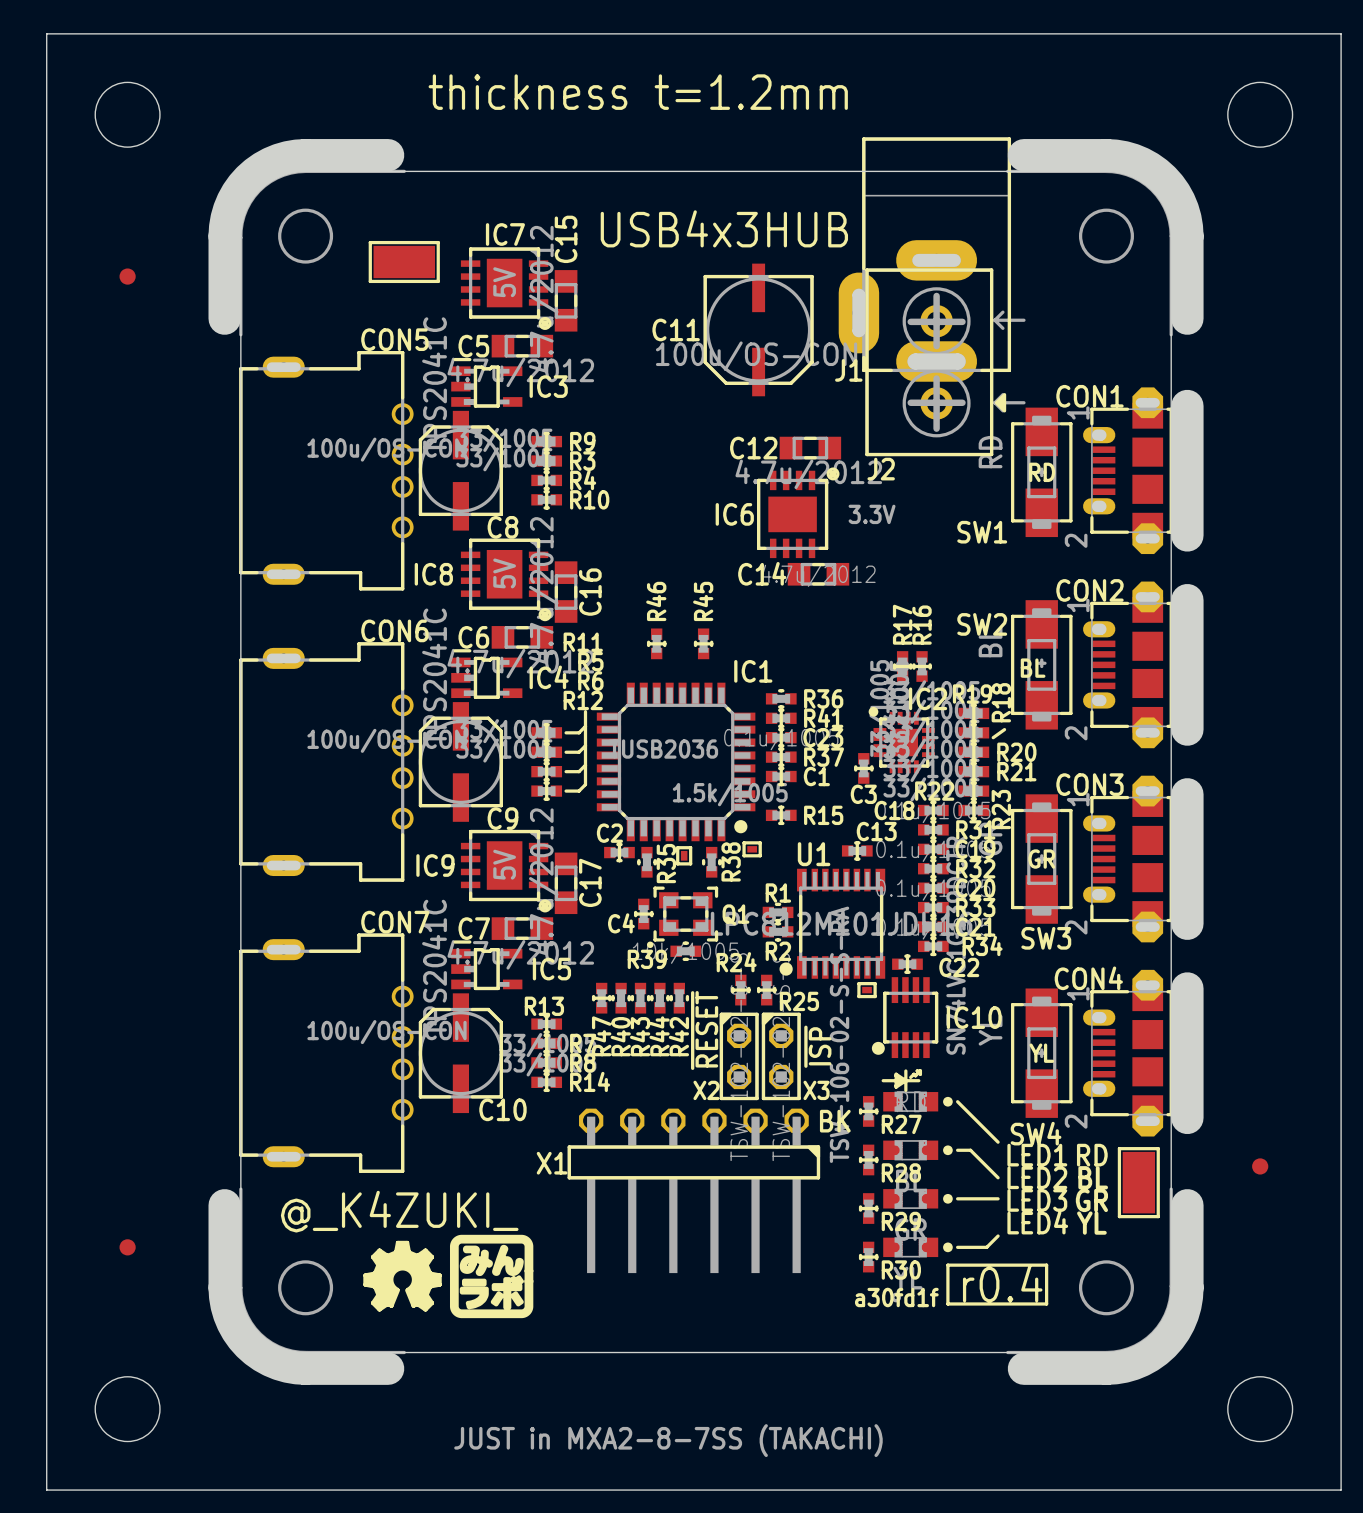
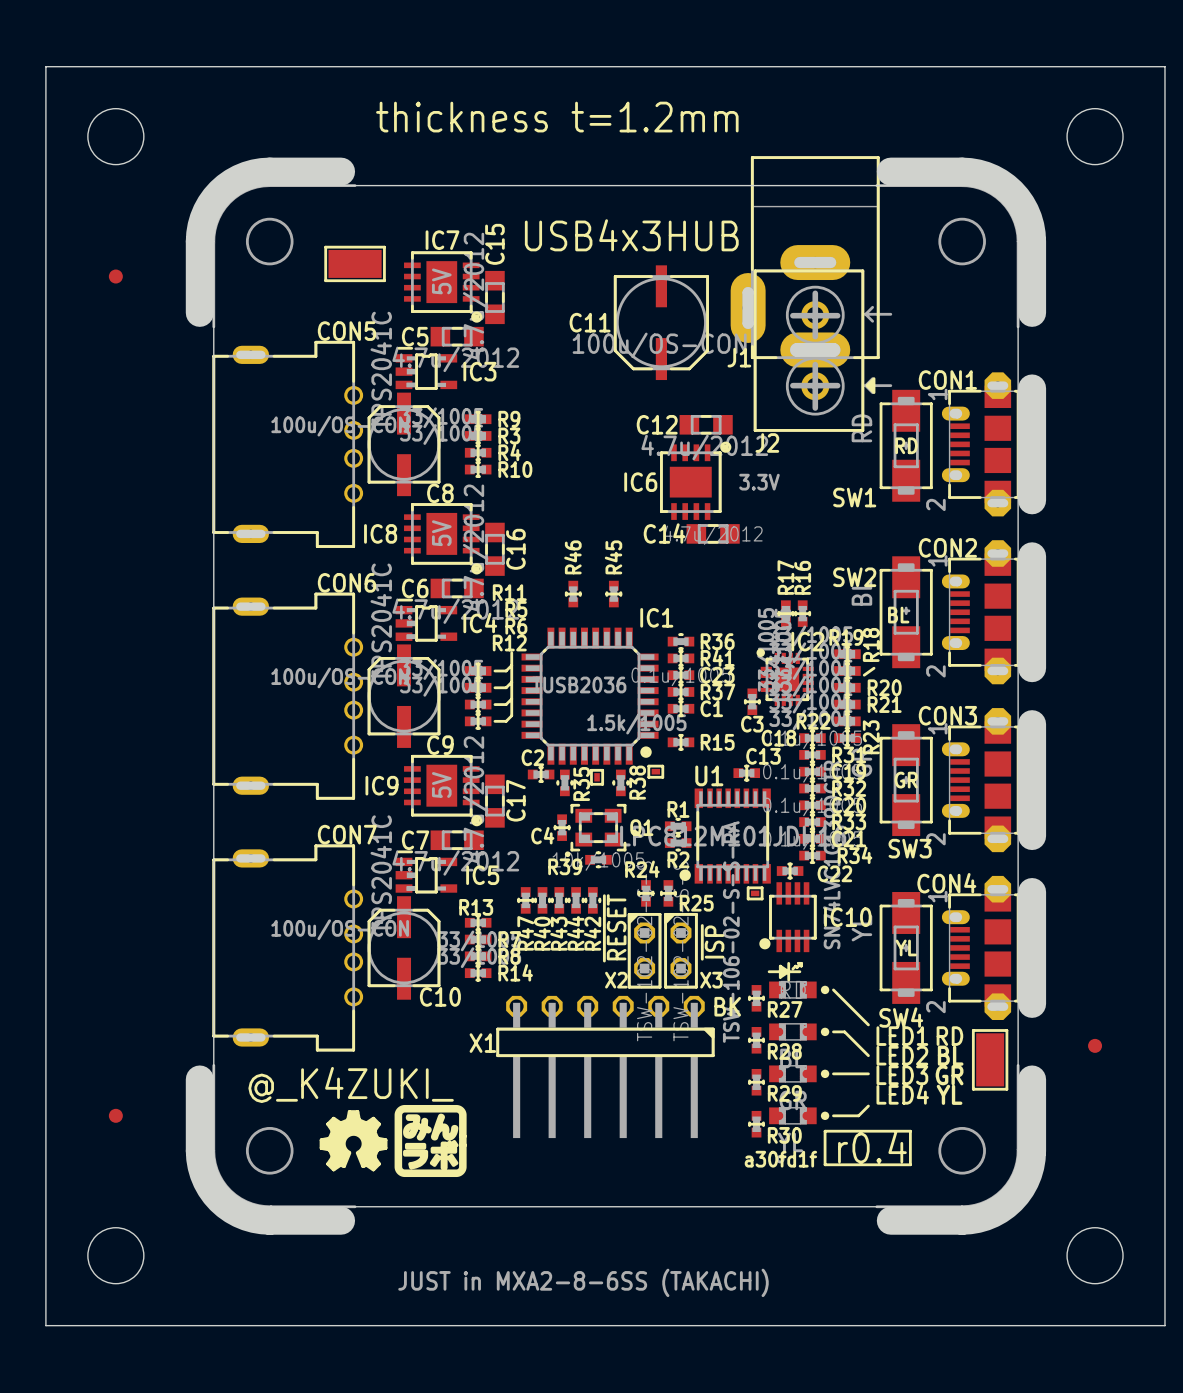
text: JUST in MXA2-8-7SS (TAKACHI) (668, 1440) -> JUST in MXA2-8-6SS (TAKACHI) (583, 1282)

